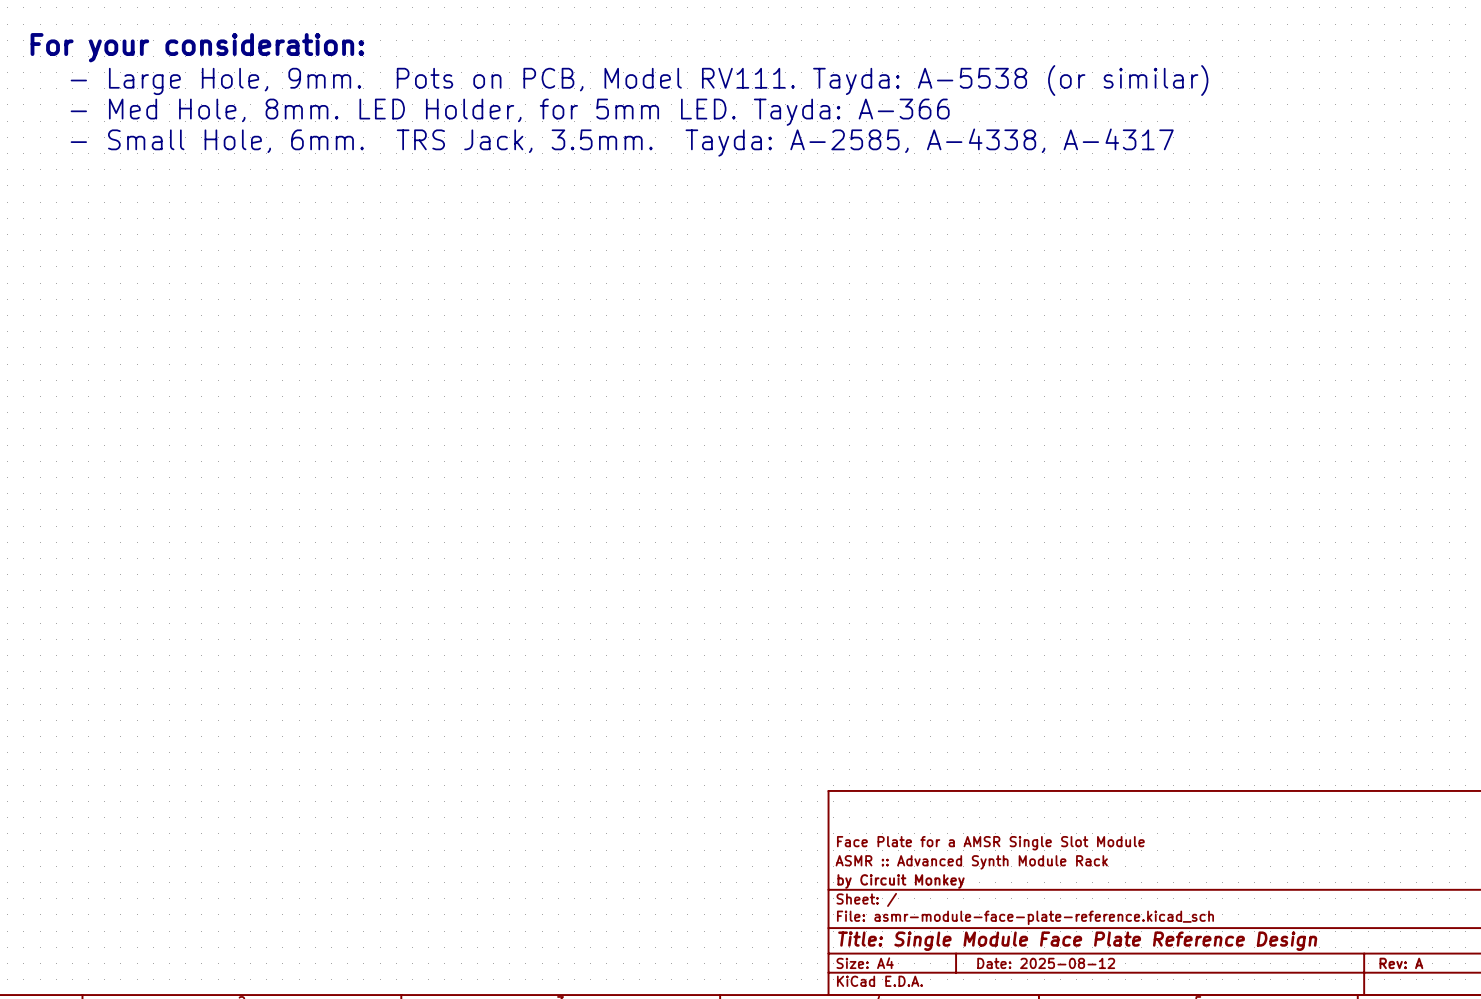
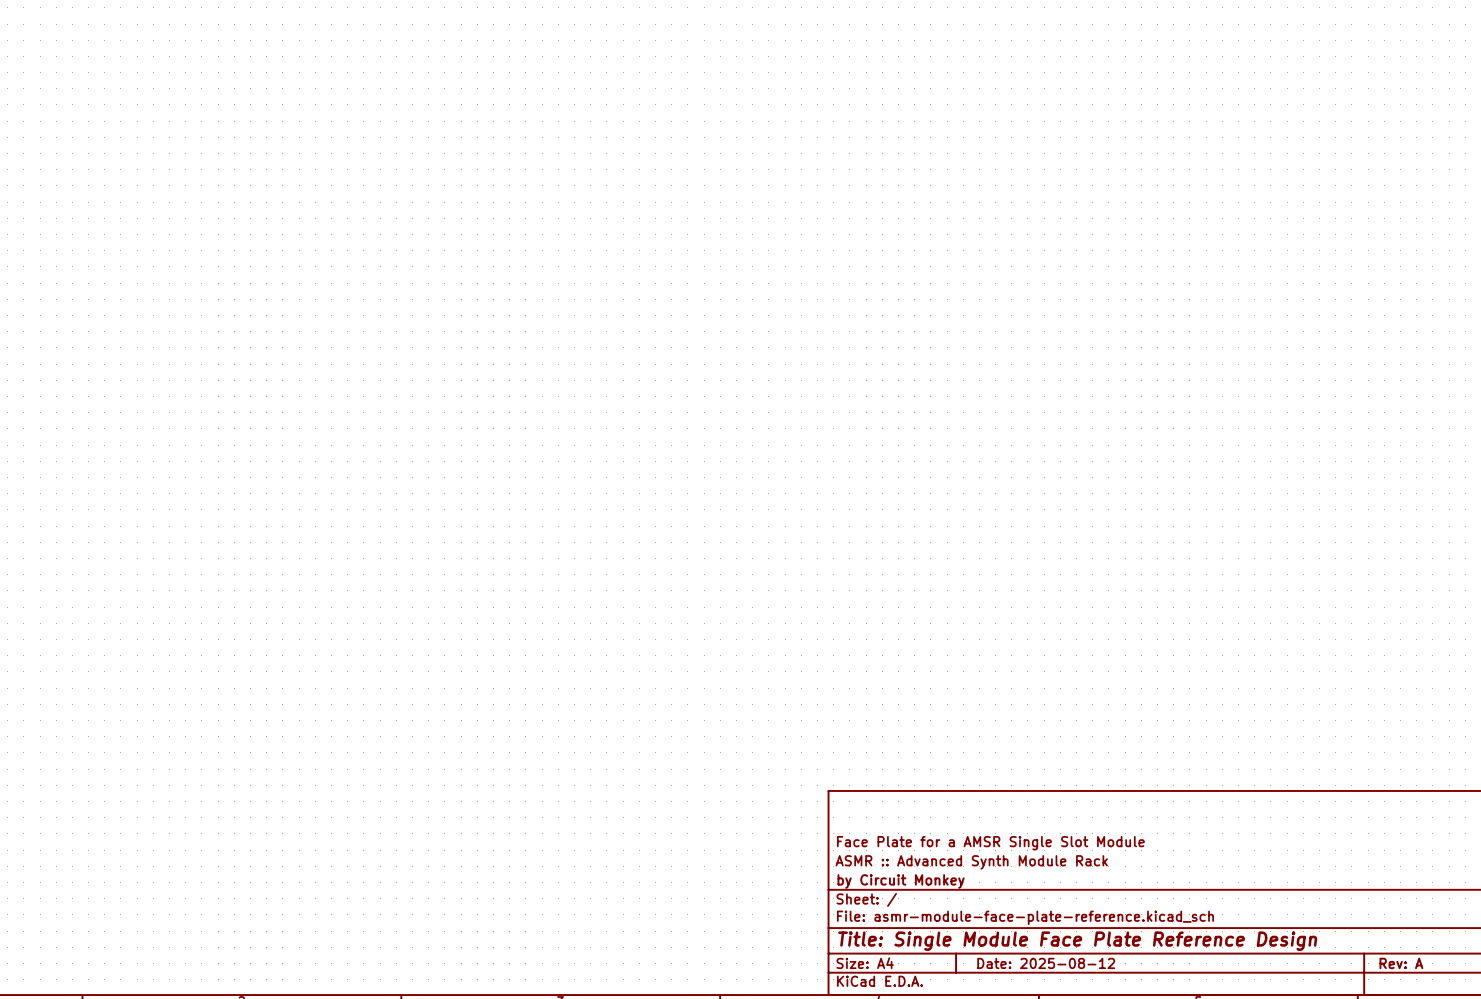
text: For your consideration: (197, 47) -> none
text: - Large Hole, 9mm. Pots on PCB, Model RV111. Tayda: A-5538 (or similar) (639, 80) -> none
text: - Med Hole, 8mm. LED Holder, for 5mm LED. Tayda: A-366 (510, 112) -> none
text: - Small Hole, 6mm. TRS Jack, 3.5mm. Tayda: A-2585, A-4338, A-4317 (622, 142) -> none

